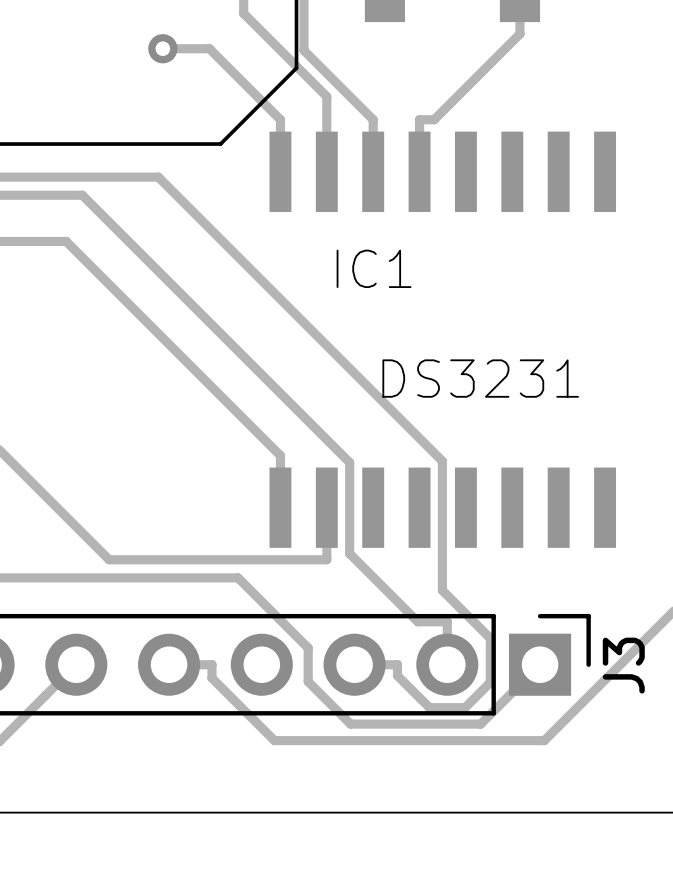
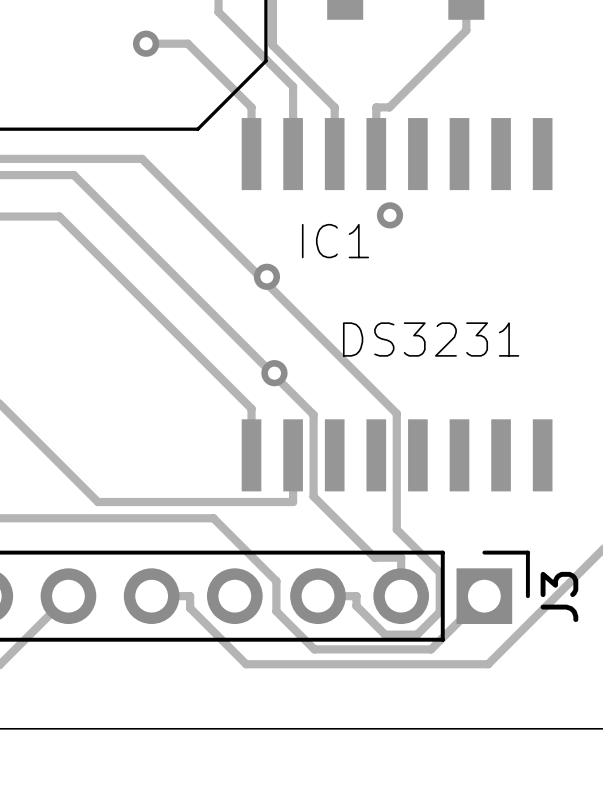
via: none -> (389, 215)
via: none -> (266, 276)
via: none -> (274, 373)

